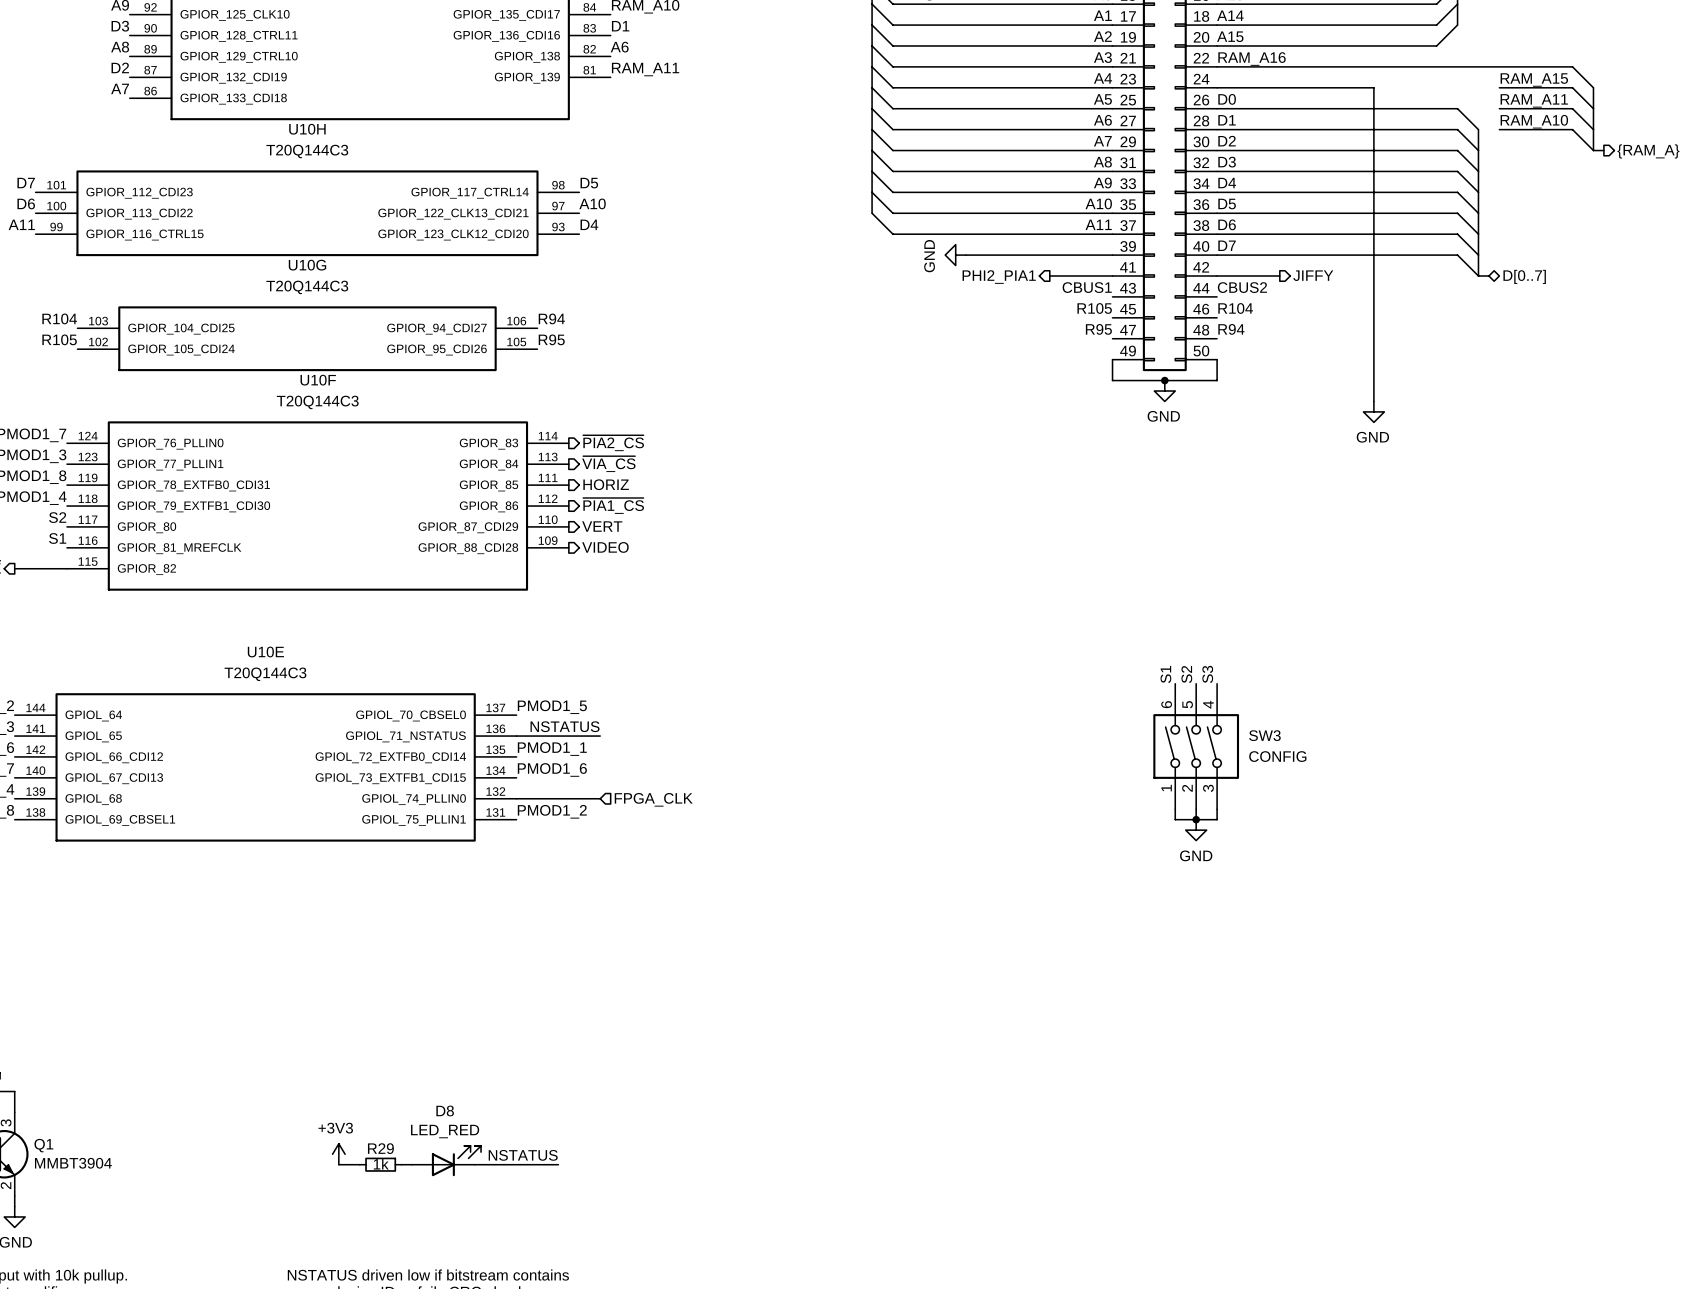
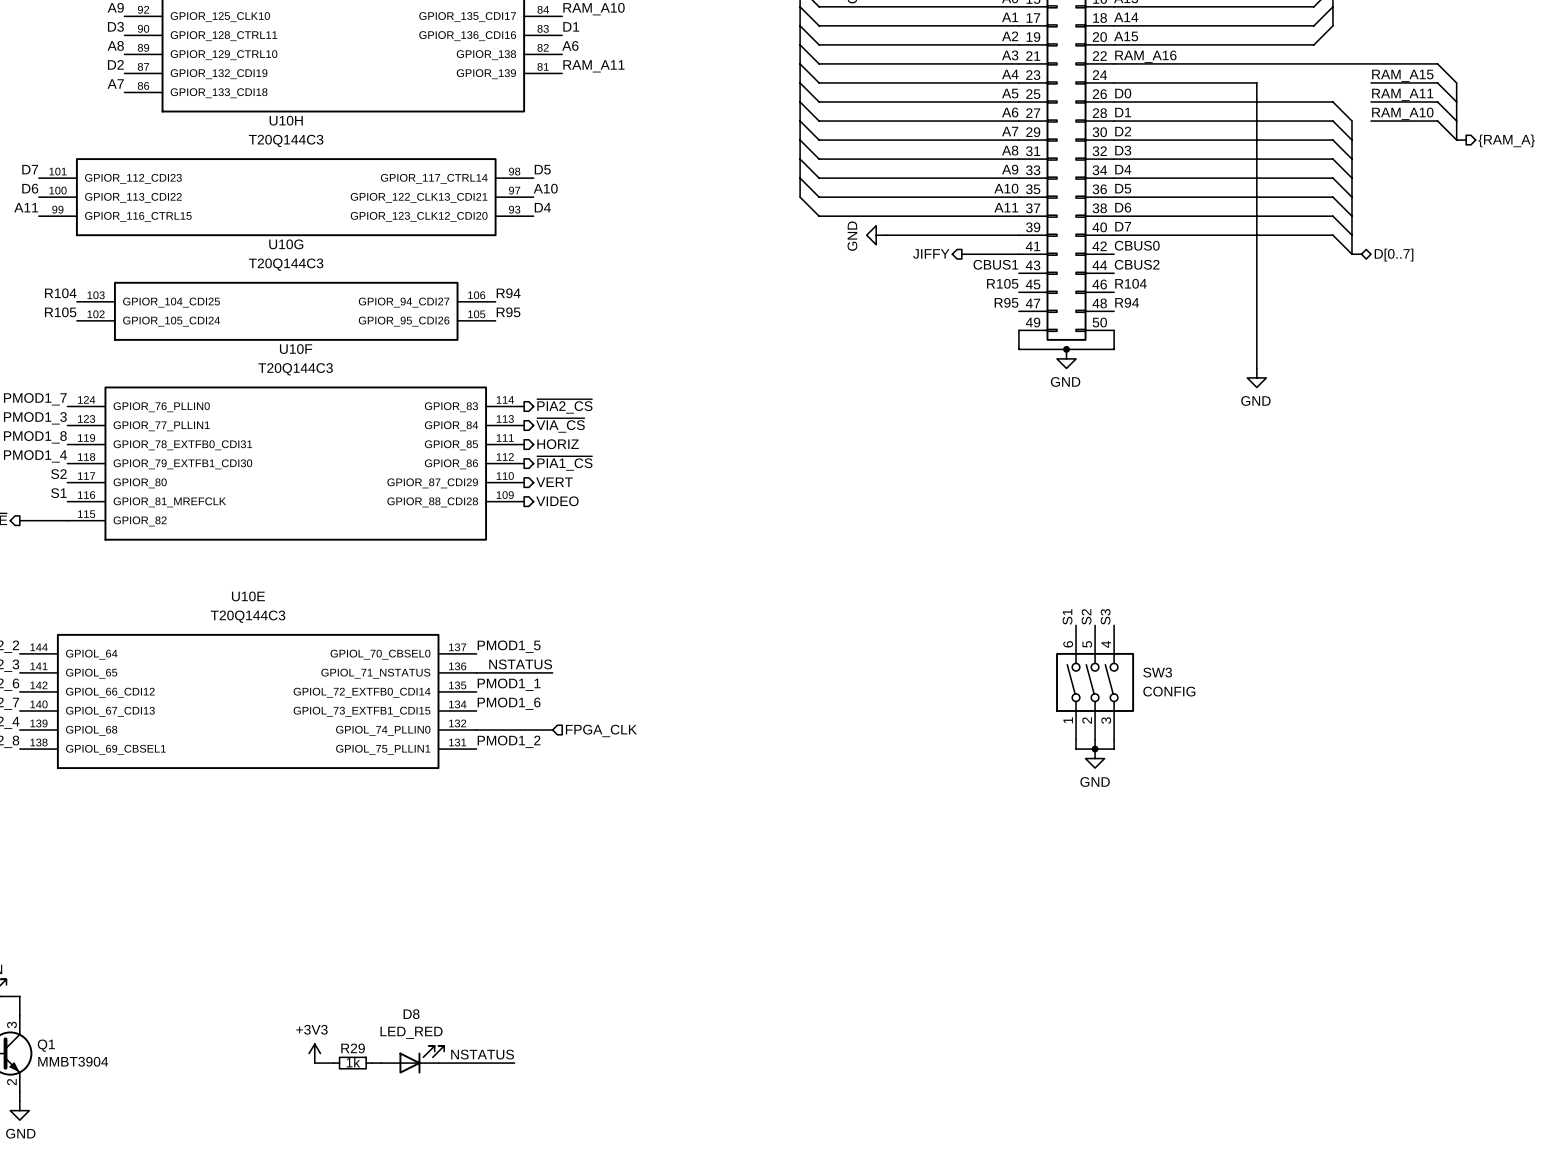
label: none -> CBUS0 (1137, 245)
hierarchical label: JIFFY (1313, 275) -> none
wire: (1217, 276) (1279, 276) -> none
hierarchical label: PHI2_PIA1 (999, 277) -> JIFFY (931, 253)

